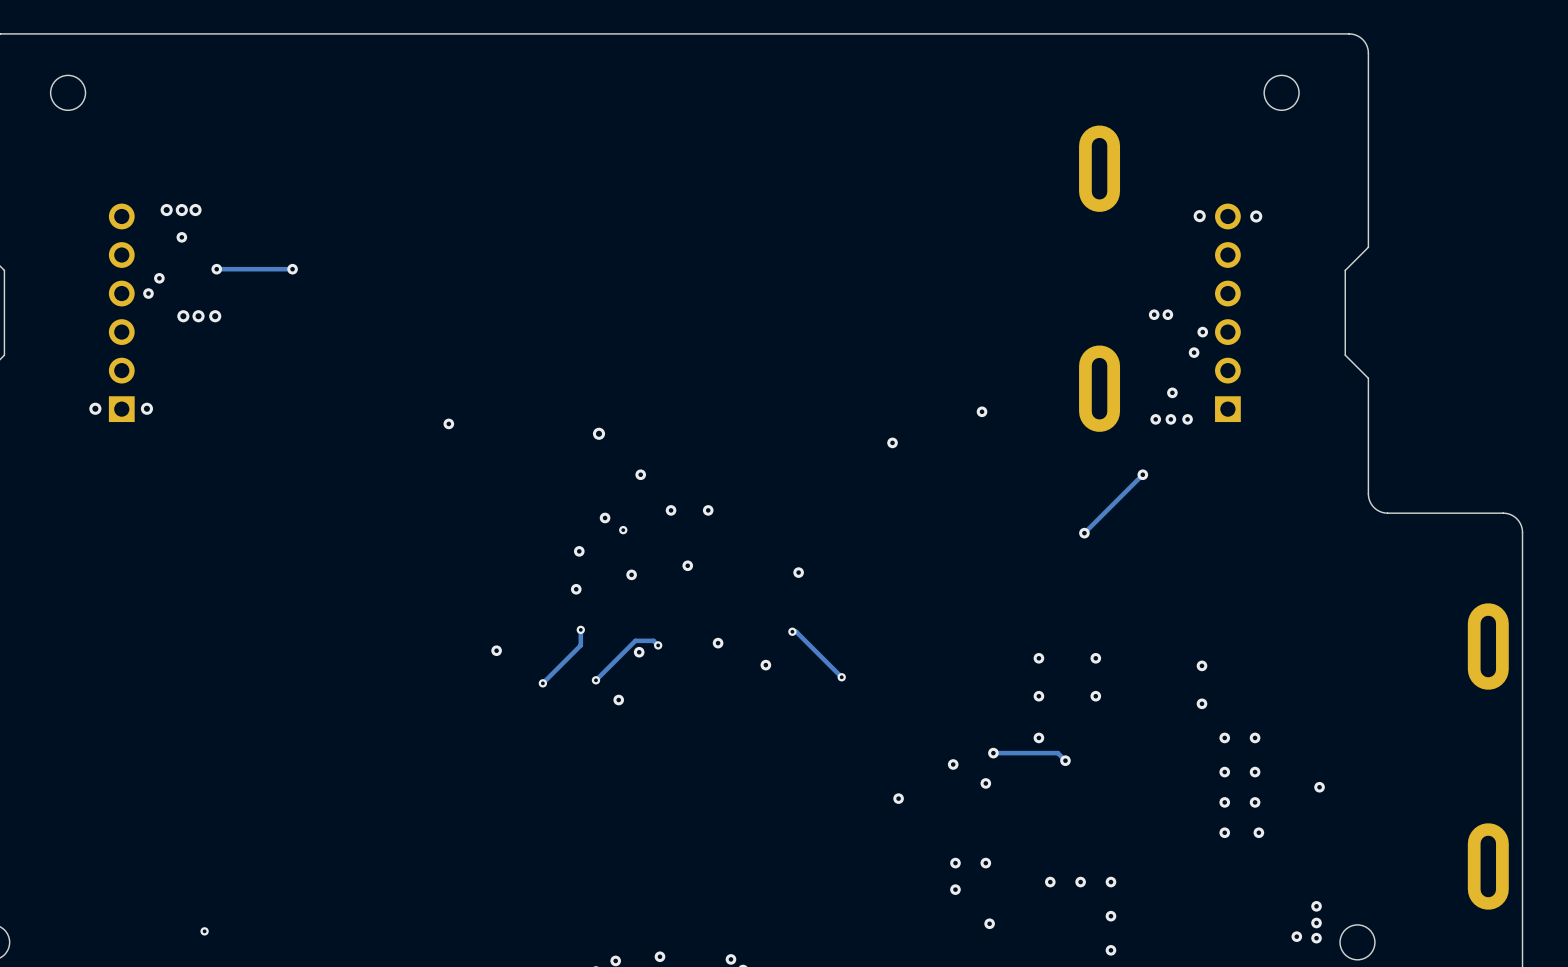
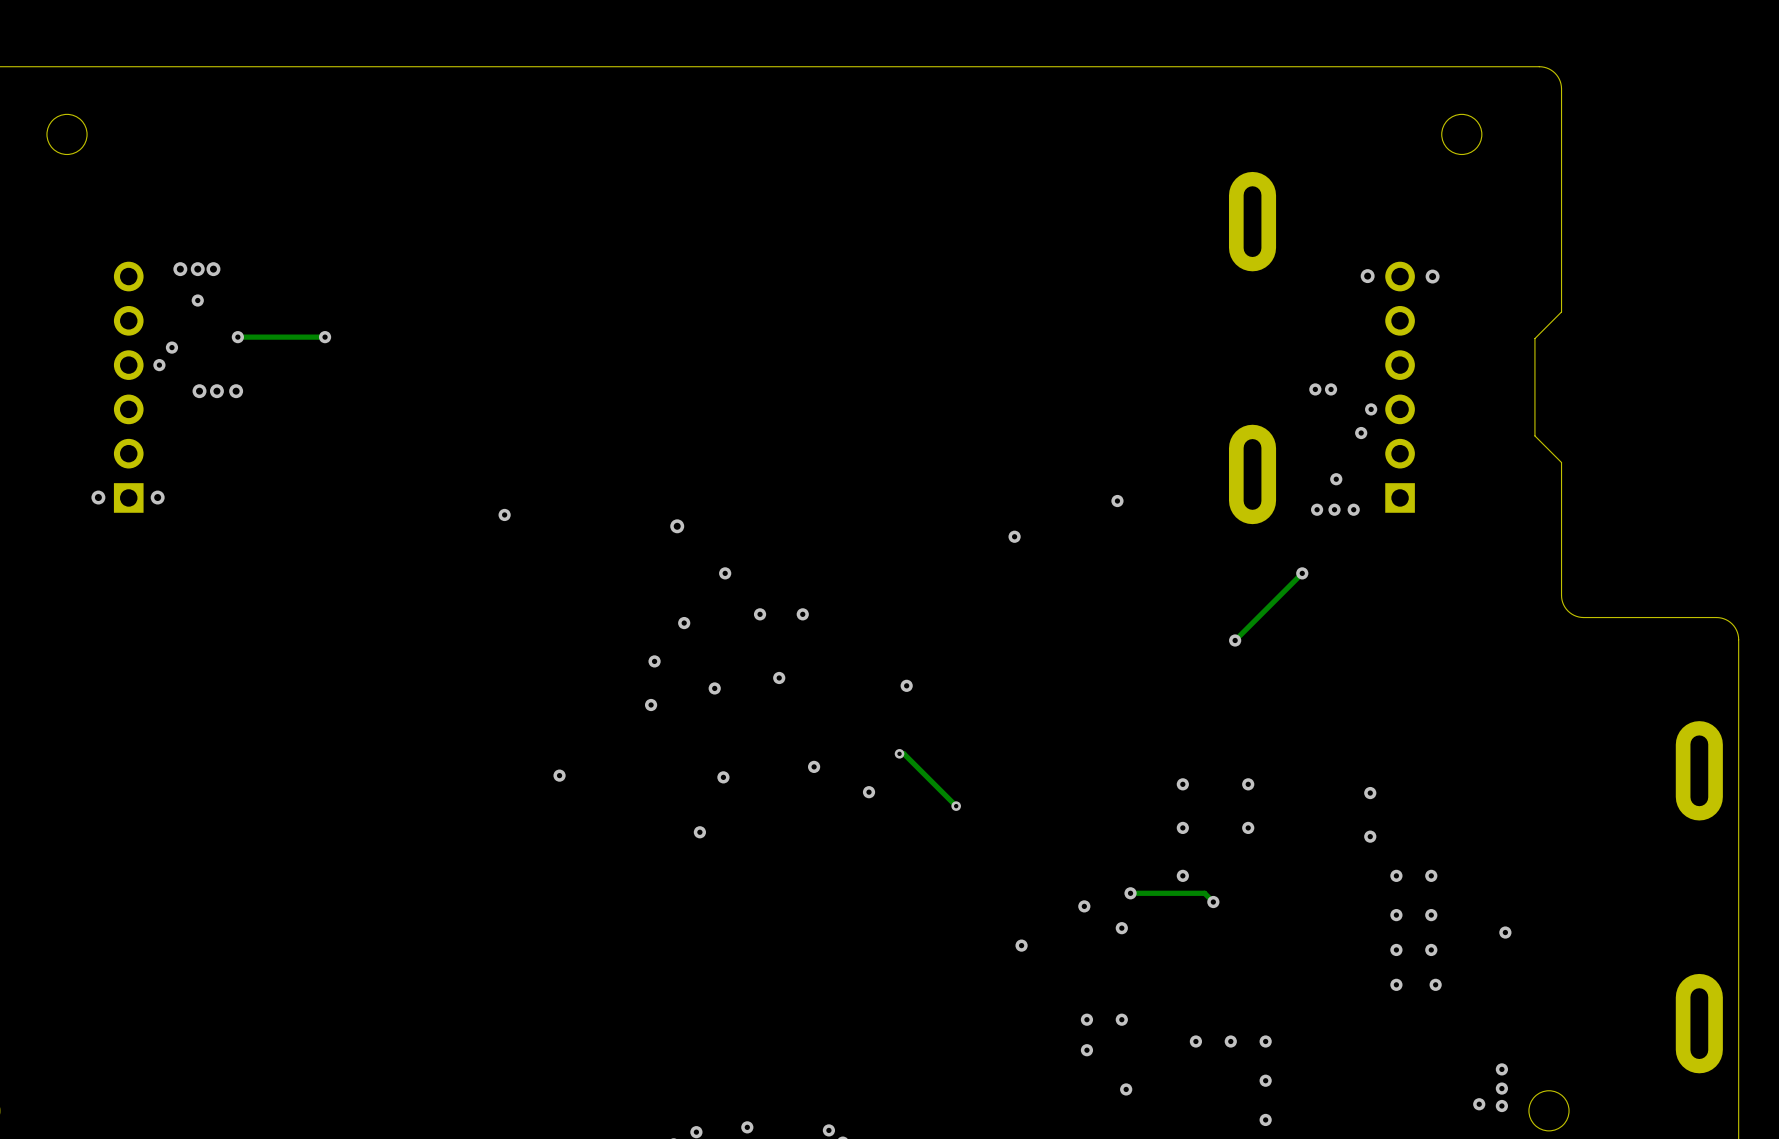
via: (623, 530) -> none
track: (580, 629) (580, 645) (542, 683) -> none
via: (580, 629) -> none
track: (658, 645) (653, 640) (635, 640) (595, 680) -> none
via: (658, 645) -> none
via: (595, 680) -> none
via: (542, 683) -> none
via: (204, 931) -> none

